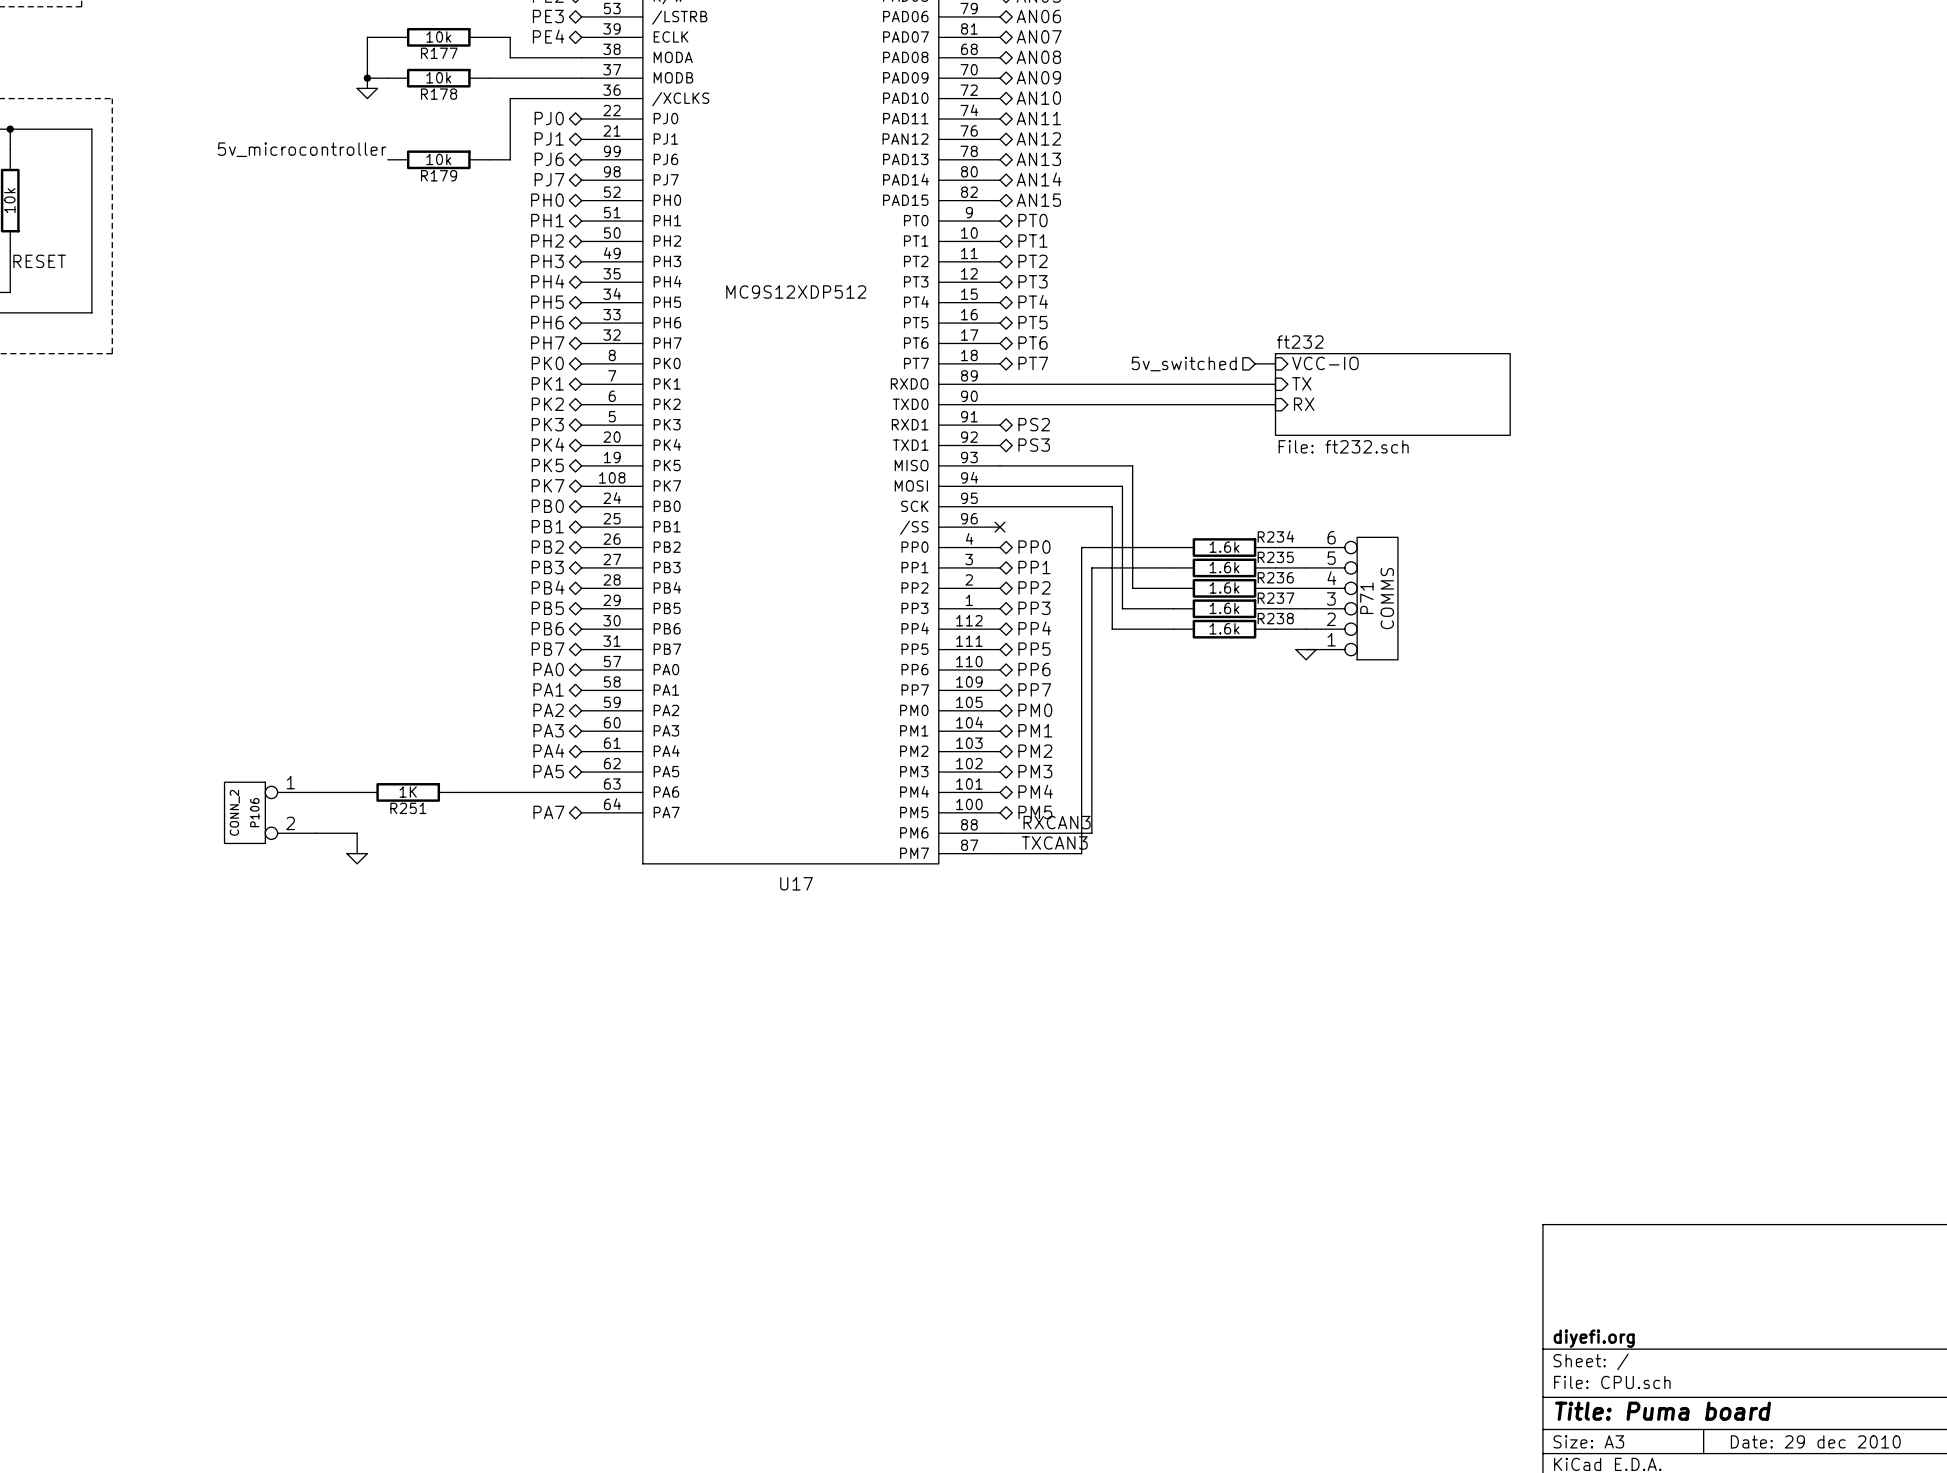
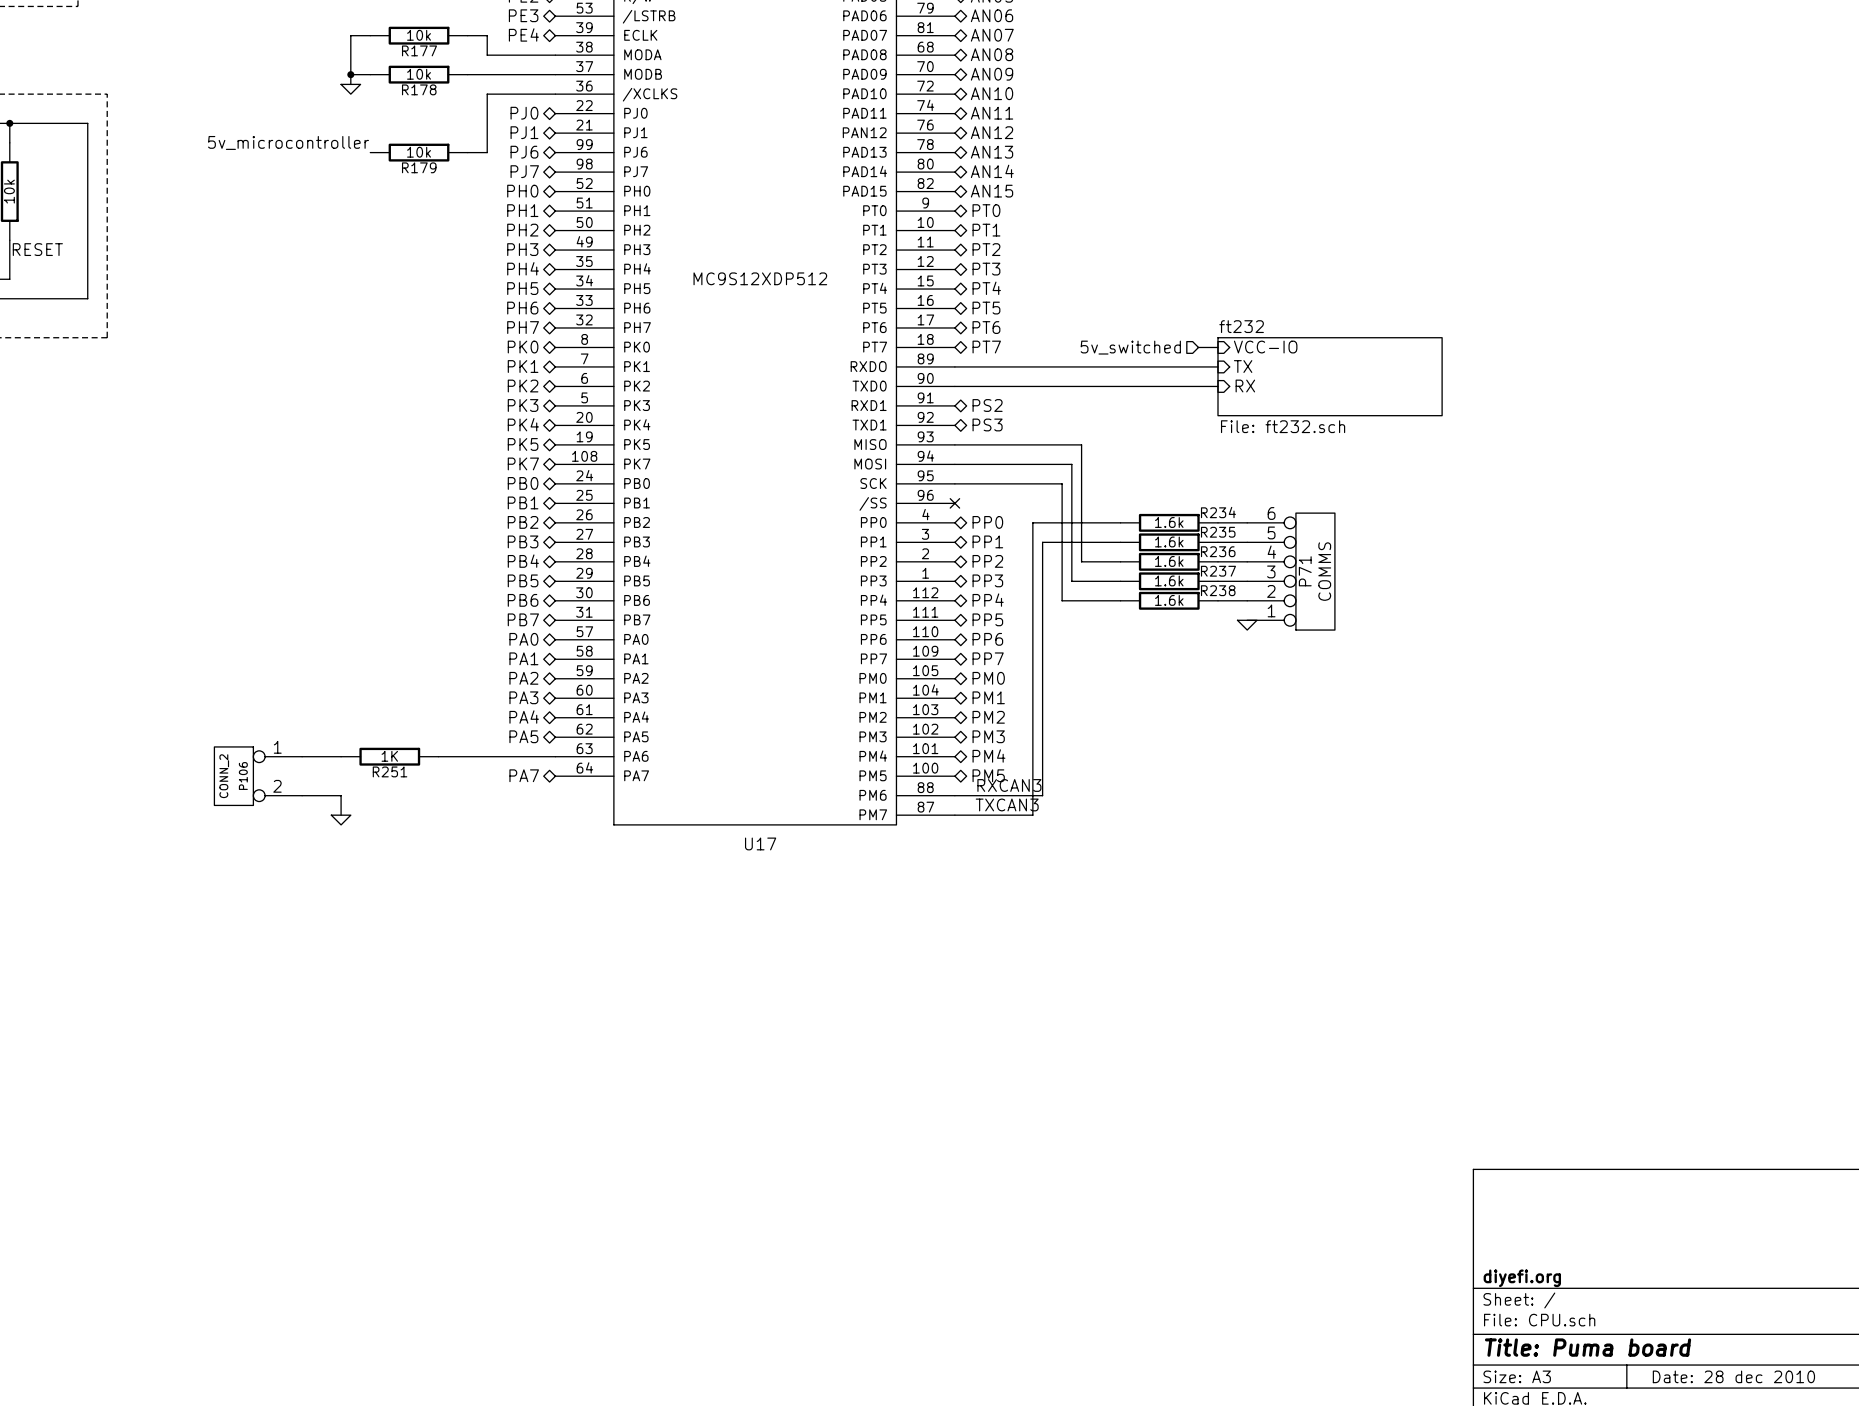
title block: Date: 29 dec 2010 (1815, 1441) -> Date: 28 dec 2010 (1733, 1376)

